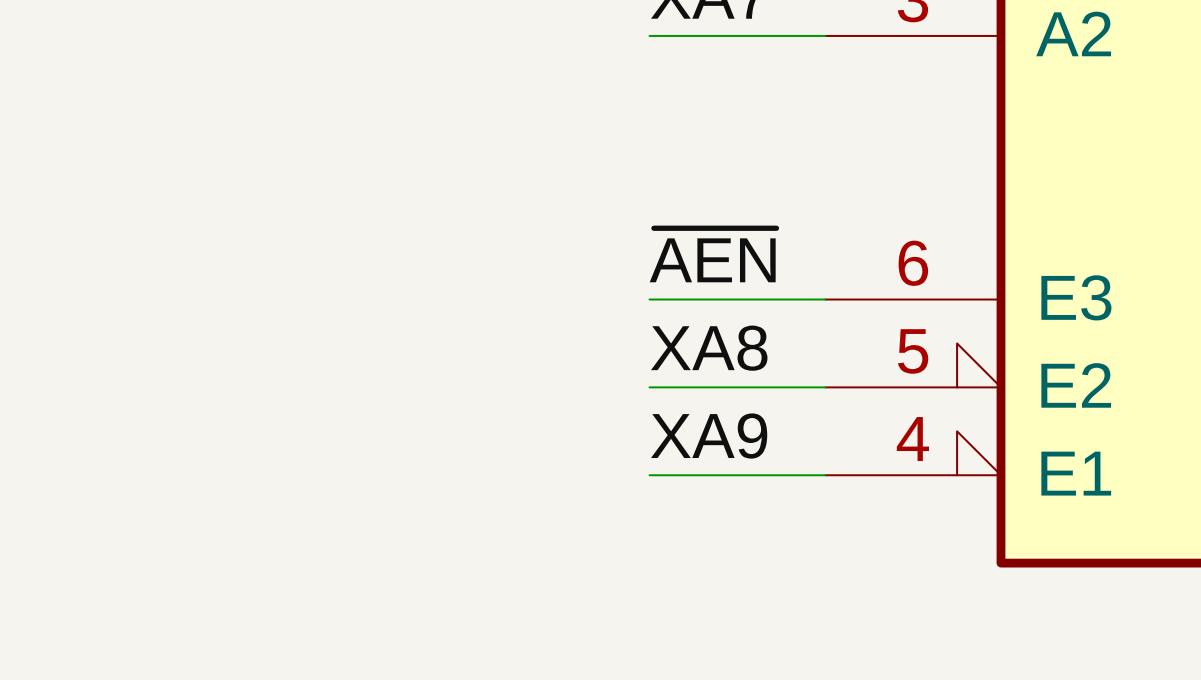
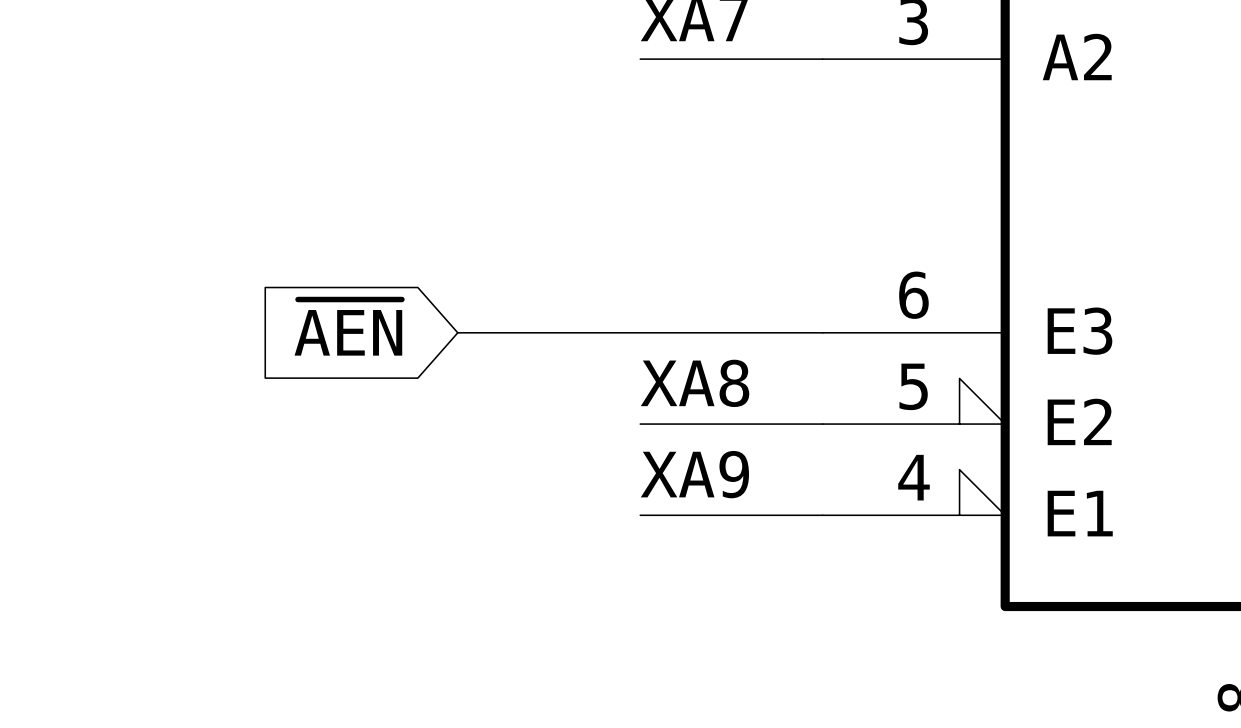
label: ~{AEN} (713, 255) -> none
global label: none -> ~{AEN} (348, 327)
wire: none -> (457, 332) (640, 332)

